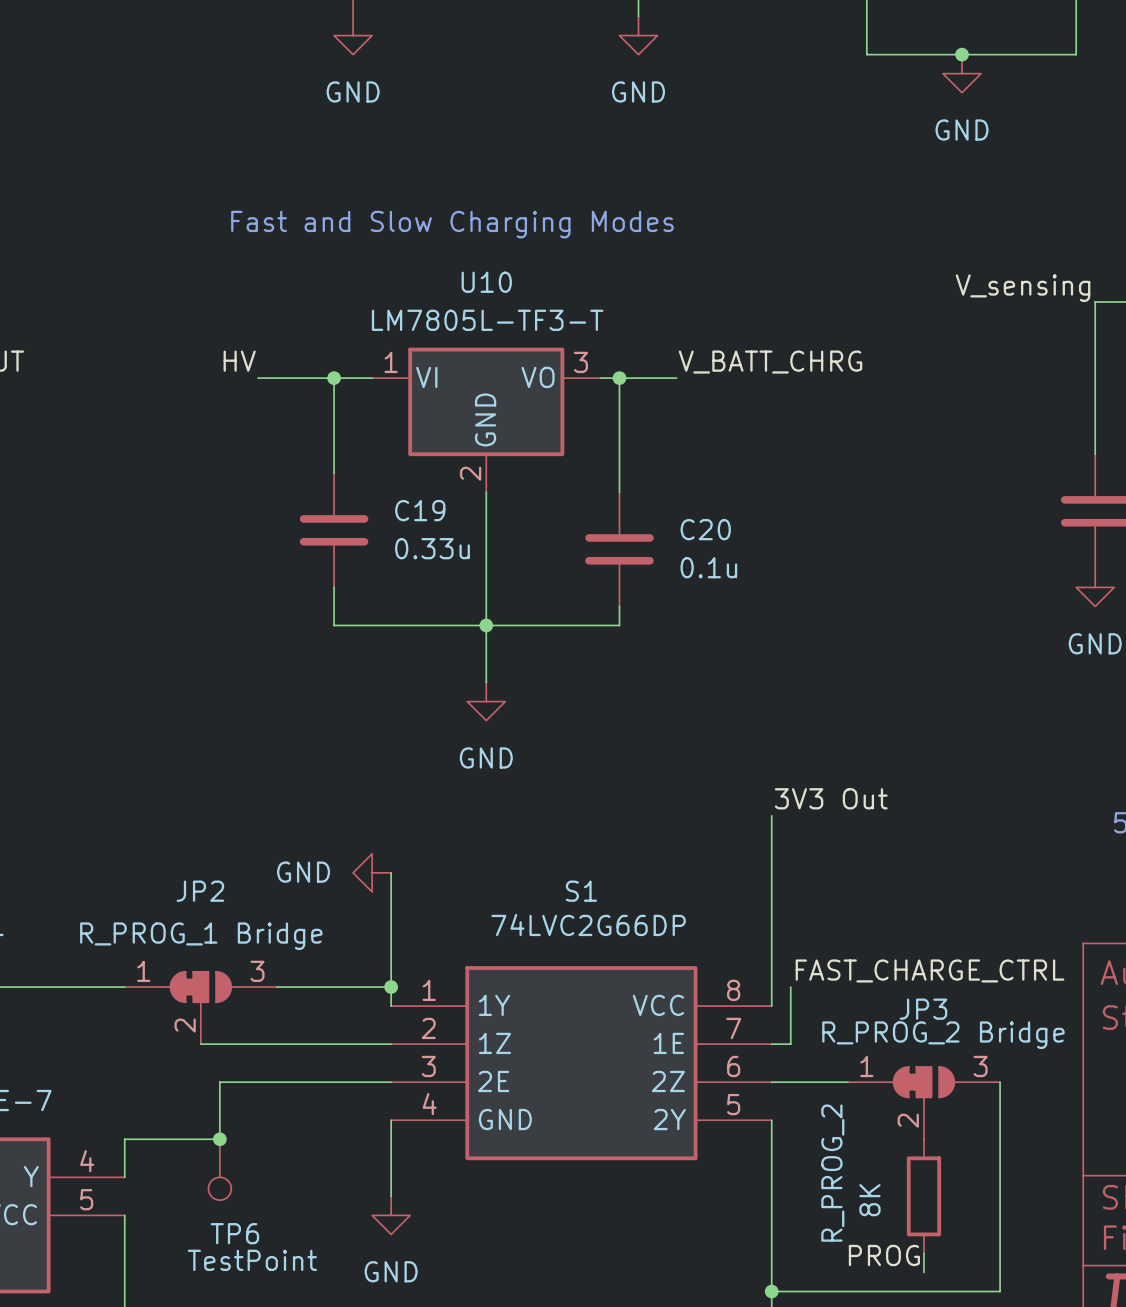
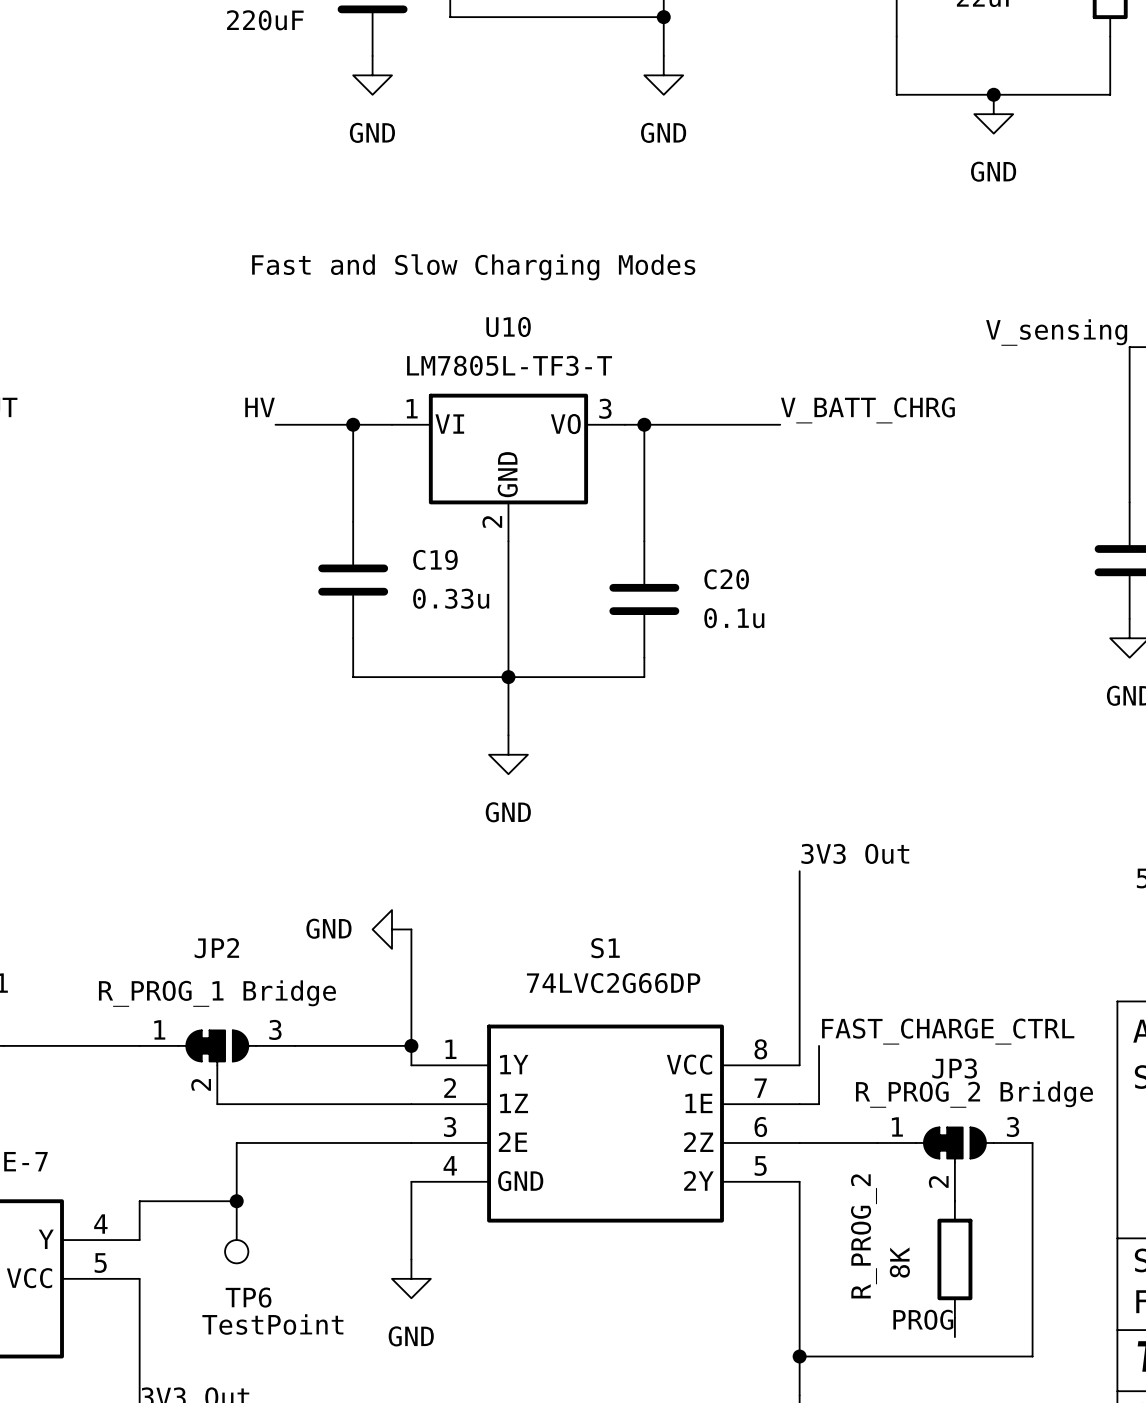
label position: V_BATT_CHRG (770, 362) -> V_BATT_CHRG (867, 410)
wire: none -> (702, 424) (780, 424)

